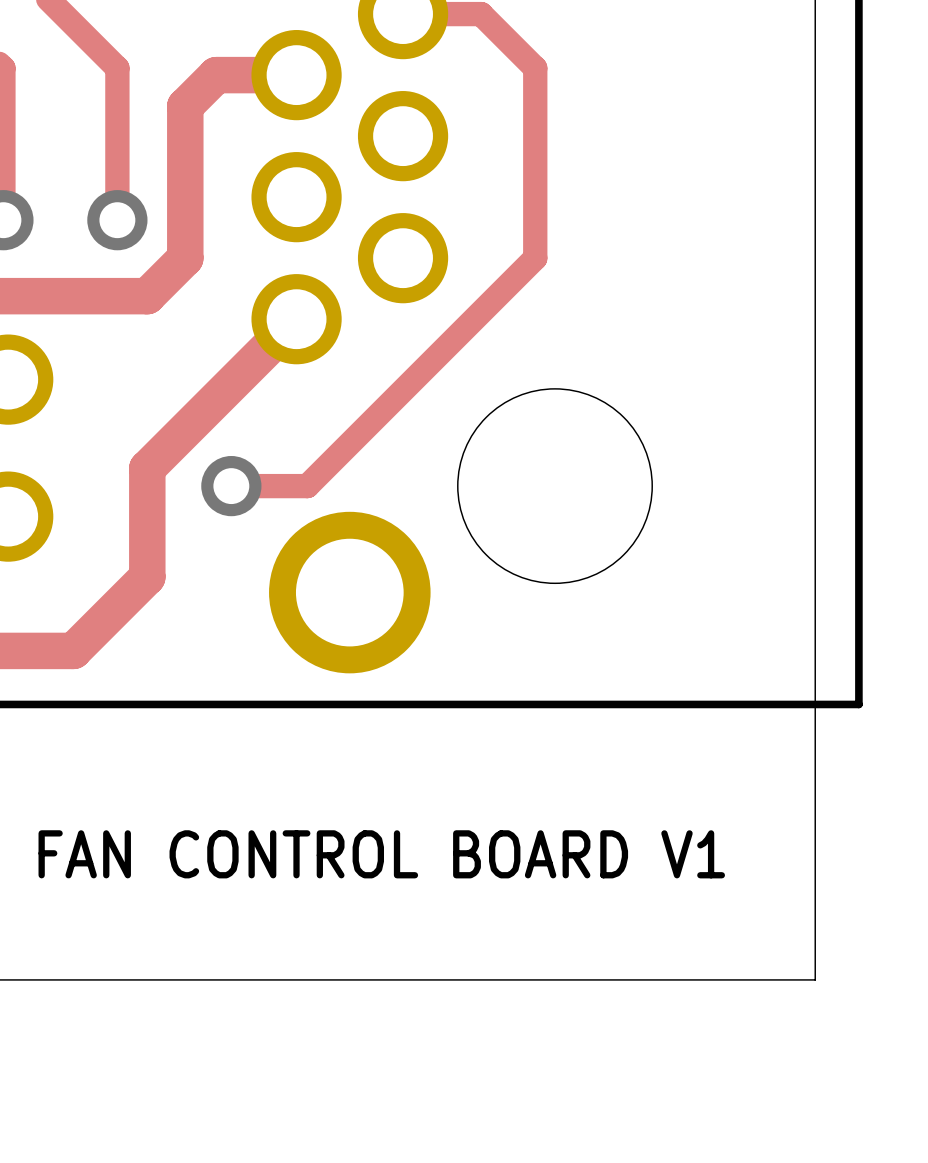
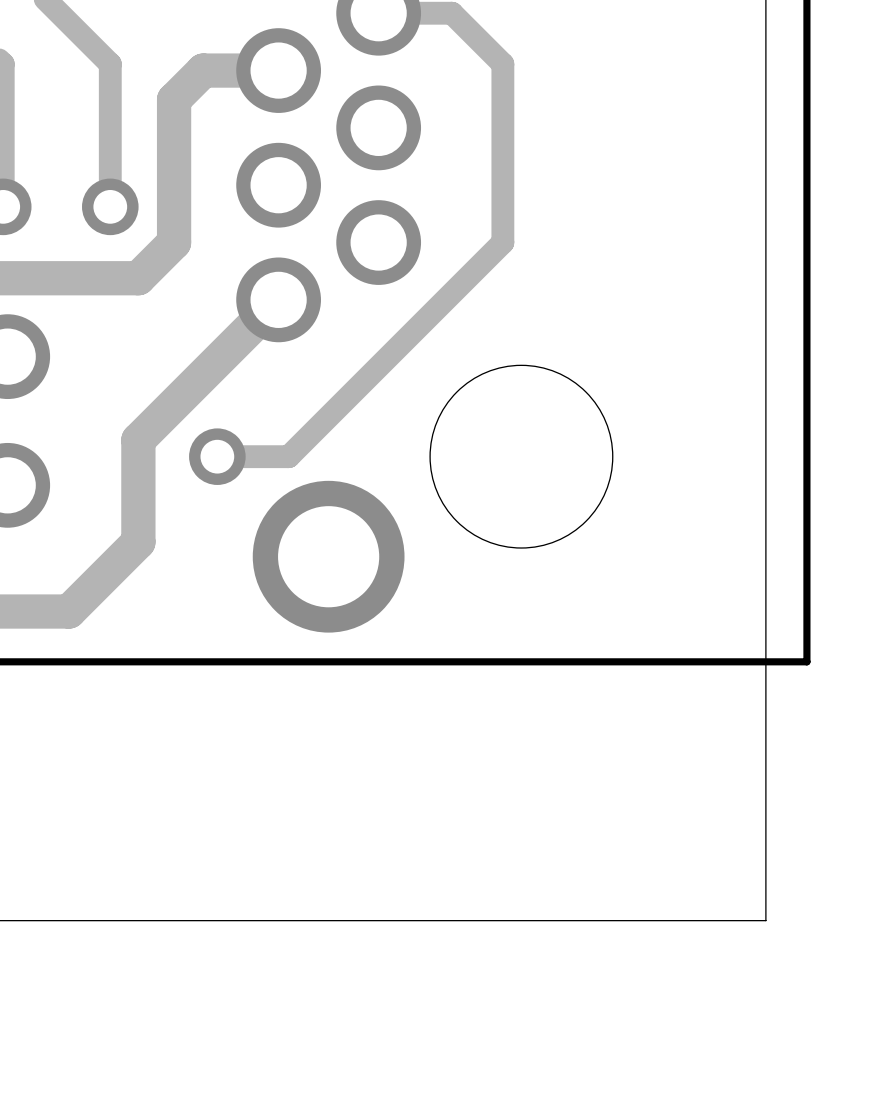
text: FAN CONTROL BOARD V1 (381, 854) -> none

